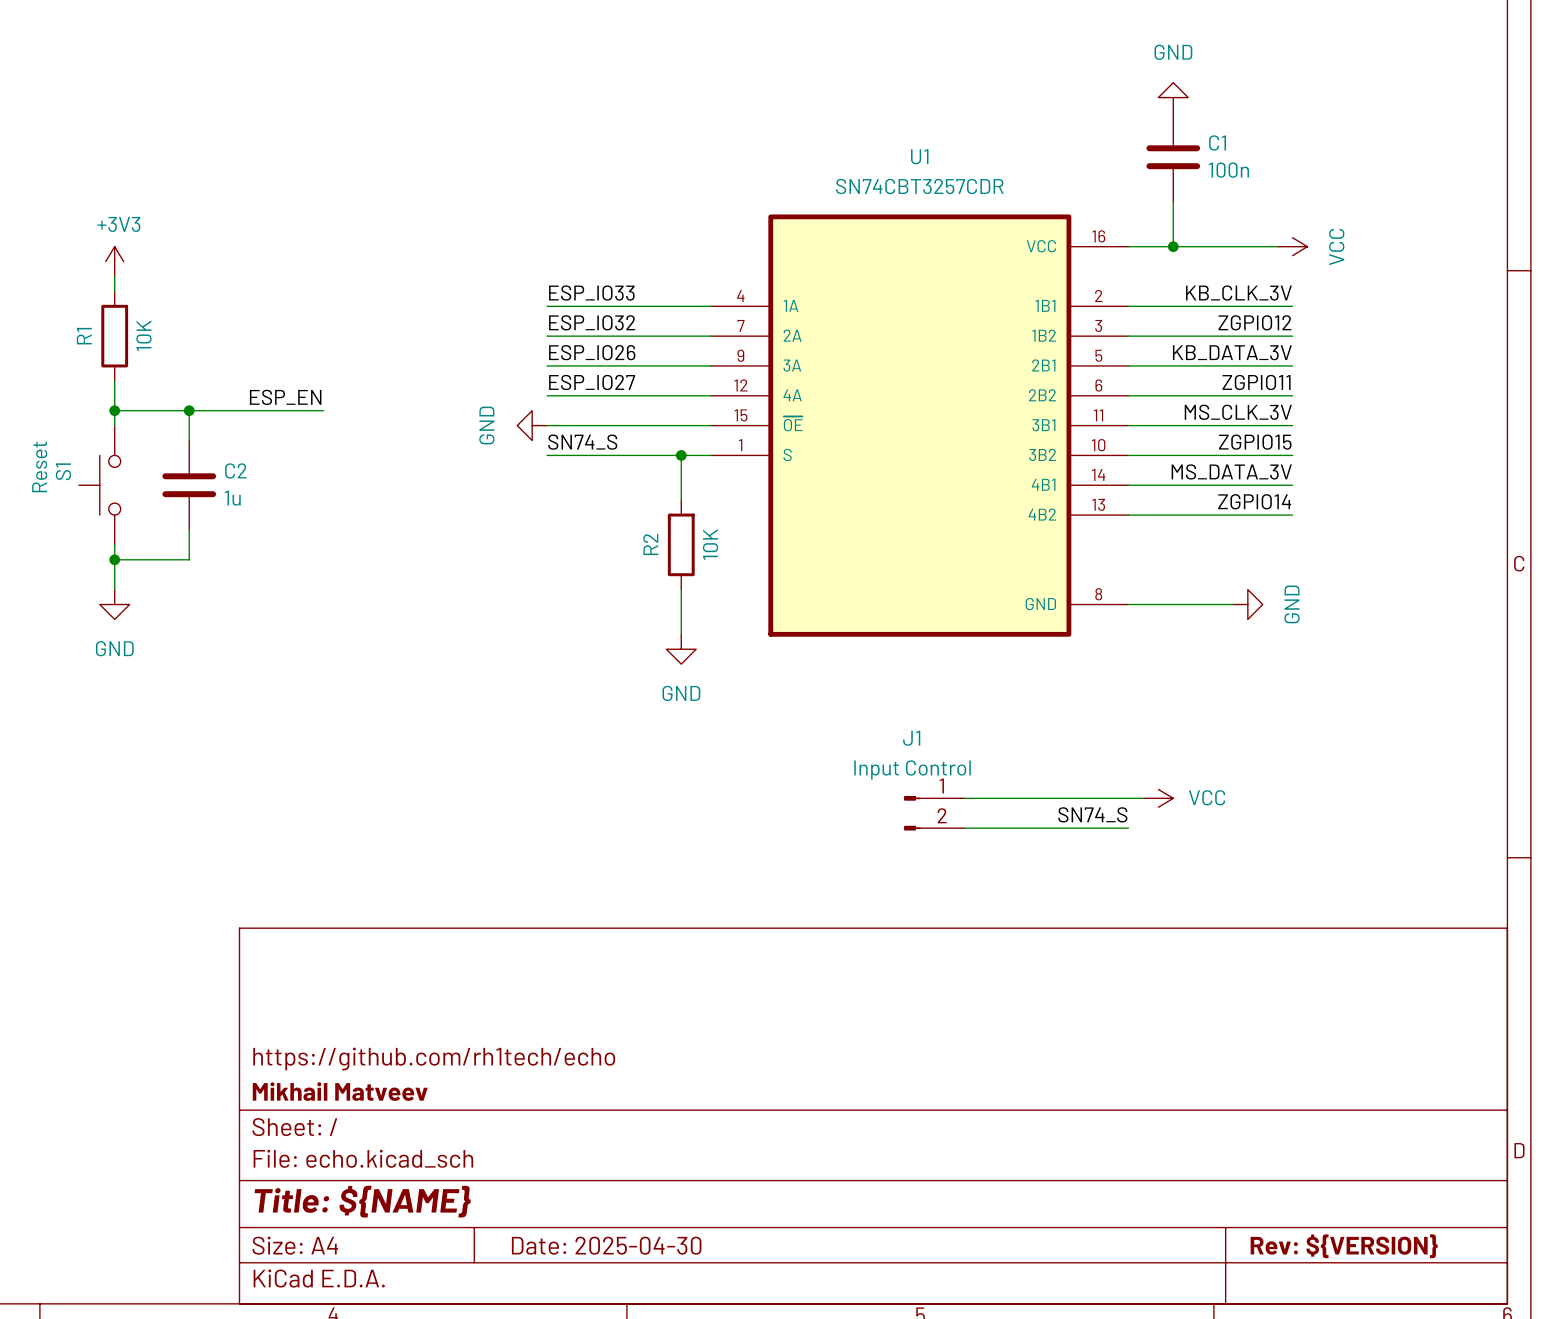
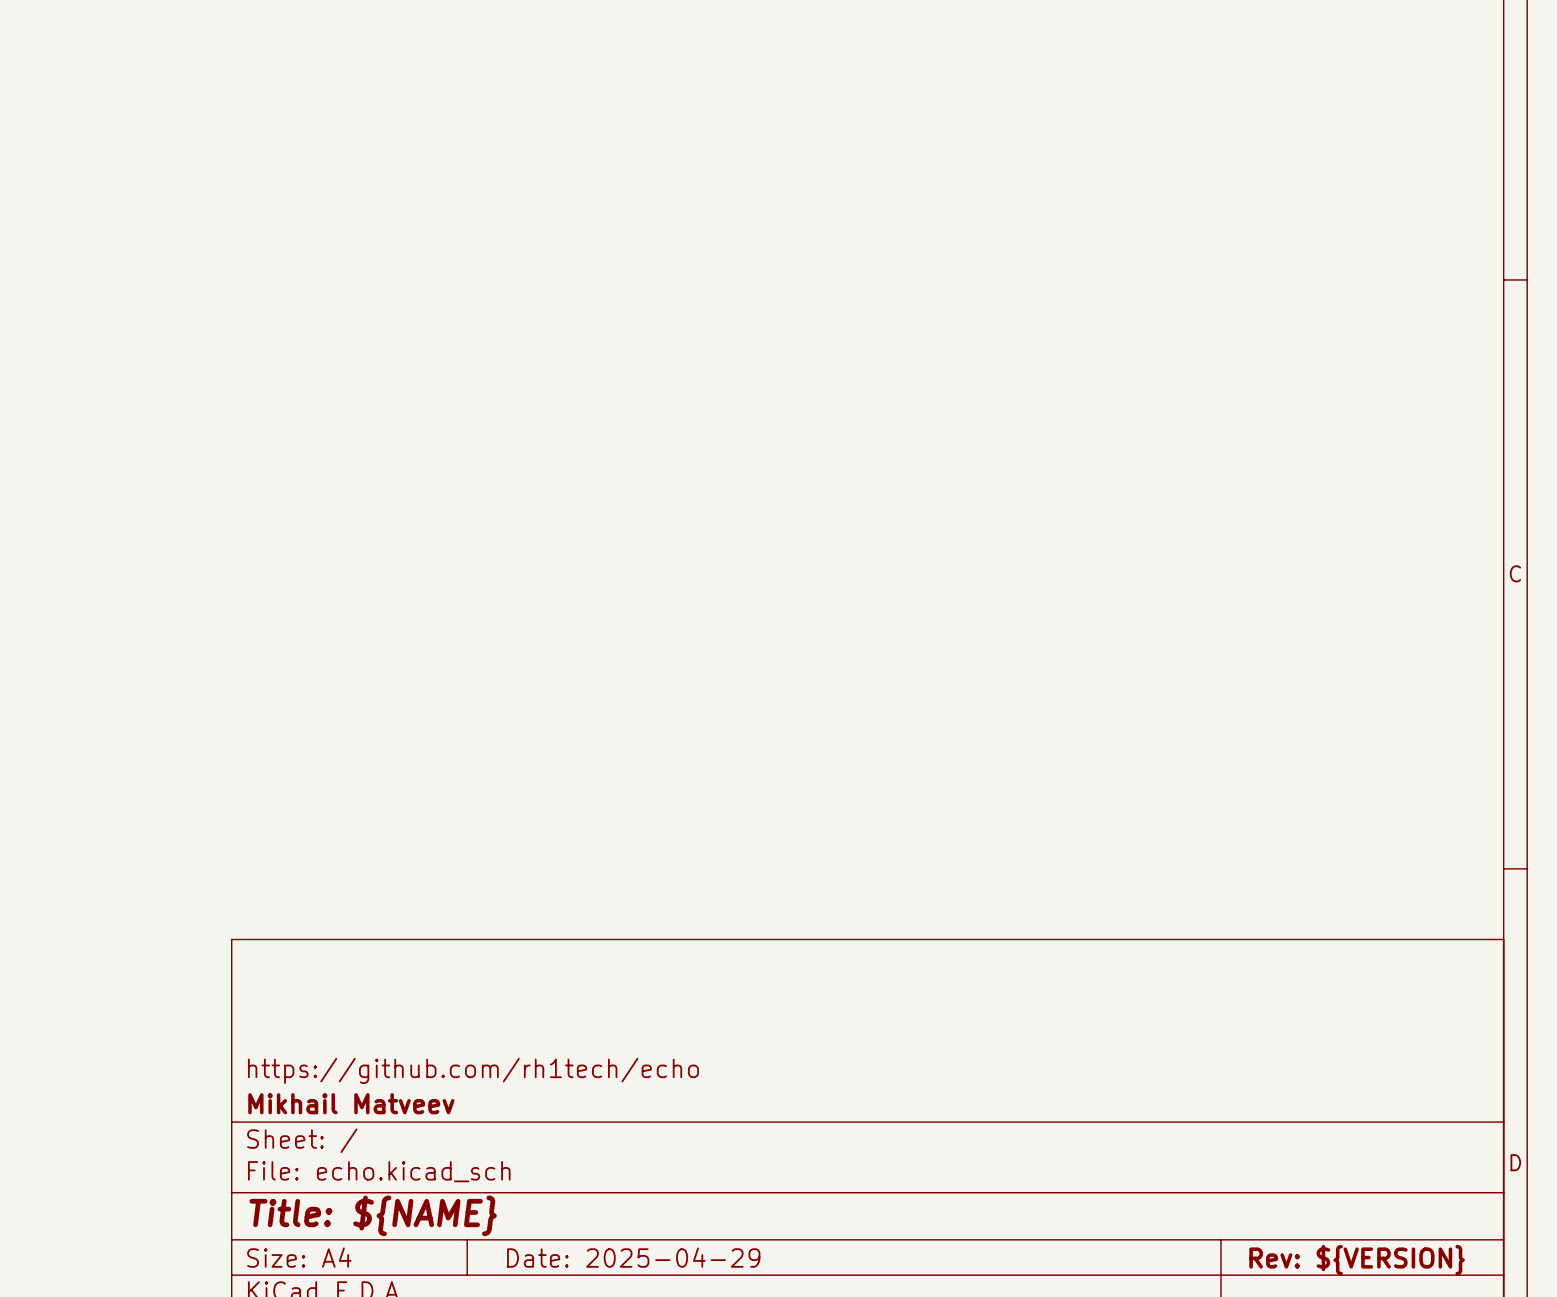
power symbol: GND (1173, 97) -> none
C1: 100n (1173, 157) -> none
wire: (1173, 201) (1173, 246) -> none
wire: (1128, 246) (1277, 246) -> none
junction: (1173, 246) -> none
power symbol: VCC (1292, 246) -> none
power symbol: +3V3 (114, 261) -> none
wire: (114, 276) (114, 291) -> none
label: ESP_IO33 (591, 293) -> none
label: KB_CLK_3V (1238, 293) -> none
wire: (547, 306) (711, 306) -> none
wire: (1128, 306) (1292, 306) -> none
label: ESP_IO32 (592, 322) -> none
label: ZGPIO12 (1254, 322) -> none
R1: 10K (114, 336) -> none
wire: (547, 336) (711, 336) -> none
wire: (1128, 336) (1292, 336) -> none
label: ESP_IO26 (592, 352) -> none
label: KB_DATA_3V (1232, 352) -> none
wire: (547, 365) (711, 365) -> none
wire: (1128, 365) (1292, 365) -> none
wire: (114, 380) (114, 425) -> none
label: ESP_IO27 (592, 382) -> none
label: ZGPIO11 (1256, 382) -> none
wire: (547, 395) (711, 395) -> none
wire: (1128, 395) (1292, 395) -> none
label: ESP_EN (285, 397) -> none
wire: (114, 410) (323, 410) -> none
junction: (114, 410) -> none
wire: (189, 410) (189, 440) -> none
junction: (189, 410) -> none
label: MS_CLK_3V (1238, 412) -> none
power symbol: GND (532, 425) -> none
wire: (547, 425) (711, 425) -> none
U1: SN74CBT3257CDR (919, 425) -> none
wire: (1128, 425) (1292, 425) -> none
label: SN74_S (582, 442) -> none
label: ZGPIO15 (1255, 442) -> none
wire: (547, 455) (711, 455) -> none
wire: (681, 455) (681, 500) -> none
junction: (681, 455) -> none
wire: (1128, 455) (1292, 455) -> none
label: MS_DATA_3V (1231, 471) -> none
S1: Reset (99, 485) -> none
C2: 1u (189, 485) -> none
wire: (1128, 485) (1292, 485) -> none
label: ZGPIO14 (1254, 501) -> none
wire: (1128, 515) (1292, 515) -> none
wire: (189, 529) (189, 559) (114, 559) -> none
wire: (114, 544) (114, 589) -> none
R2: 10K (681, 544) -> none
junction: (114, 559) -> none
wire: (681, 589) (681, 634) -> none
power symbol: GND (114, 604) -> none
wire: (1128, 604) (1232, 604) -> none
power symbol: GND (1247, 604) -> none
power symbol: GND (681, 649) -> none
wire: (964, 798) (1143, 798) -> none
power symbol: VCC (1158, 798) -> none
J1: Input Control (934, 813) -> none
label: SN74_S (1092, 814) -> none
wire: (964, 828) (1128, 828) -> none
title block: Date: 2025-04-30 (606, 1245) -> Date: 2025-04-29 (633, 1257)

